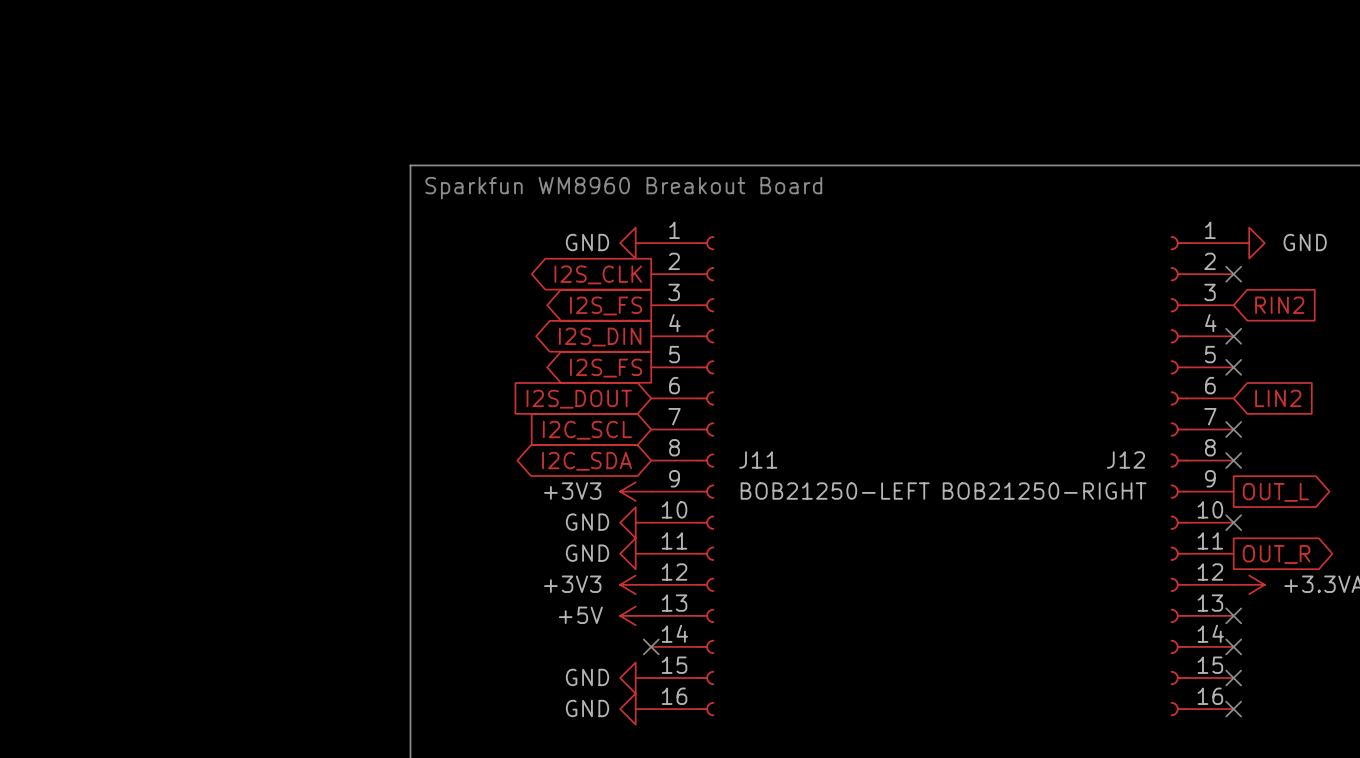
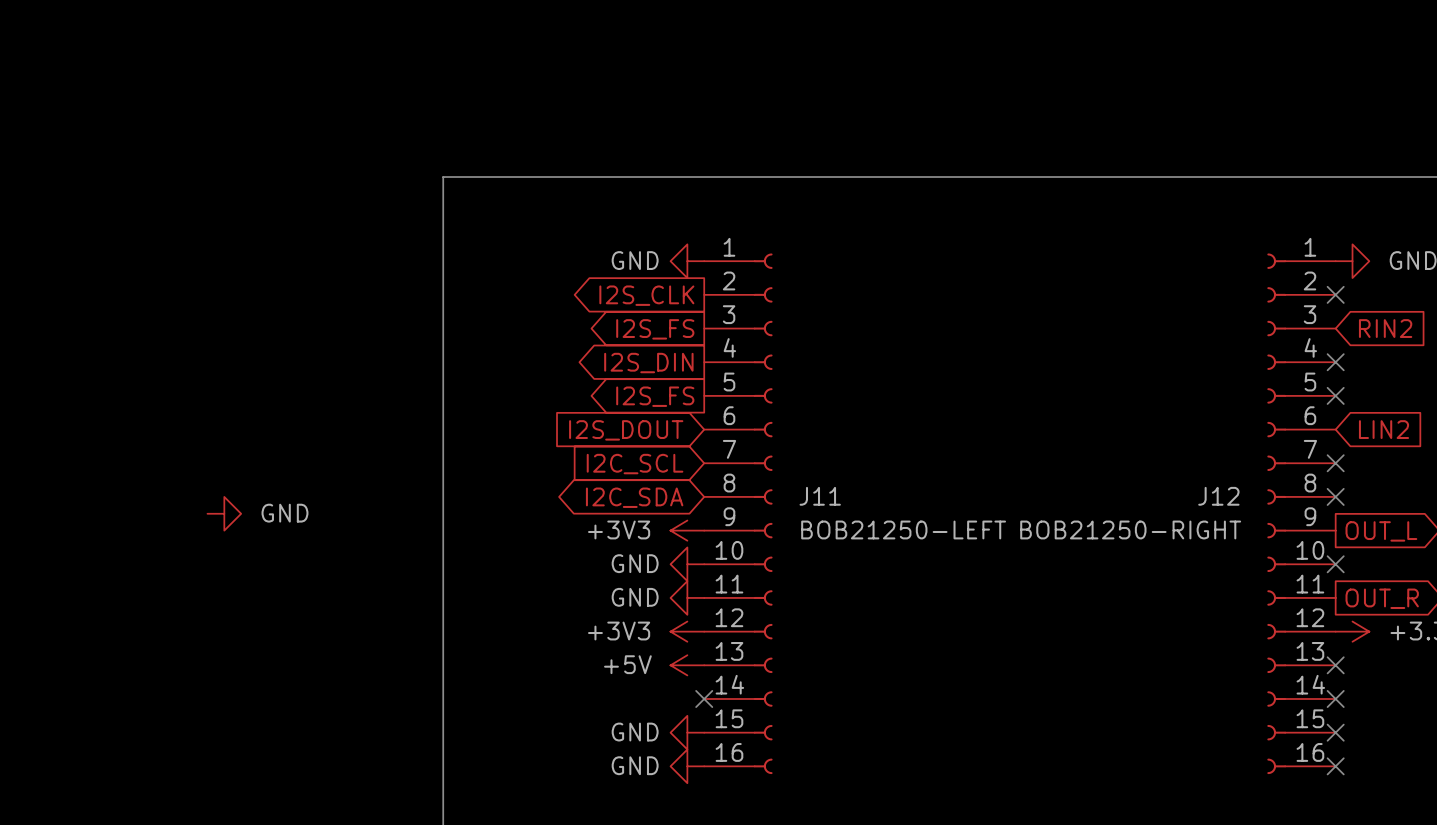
text: Sparkfun WM8960 Breakout Board (623, 188) -> none
power symbol: none -> GND (224, 513)

